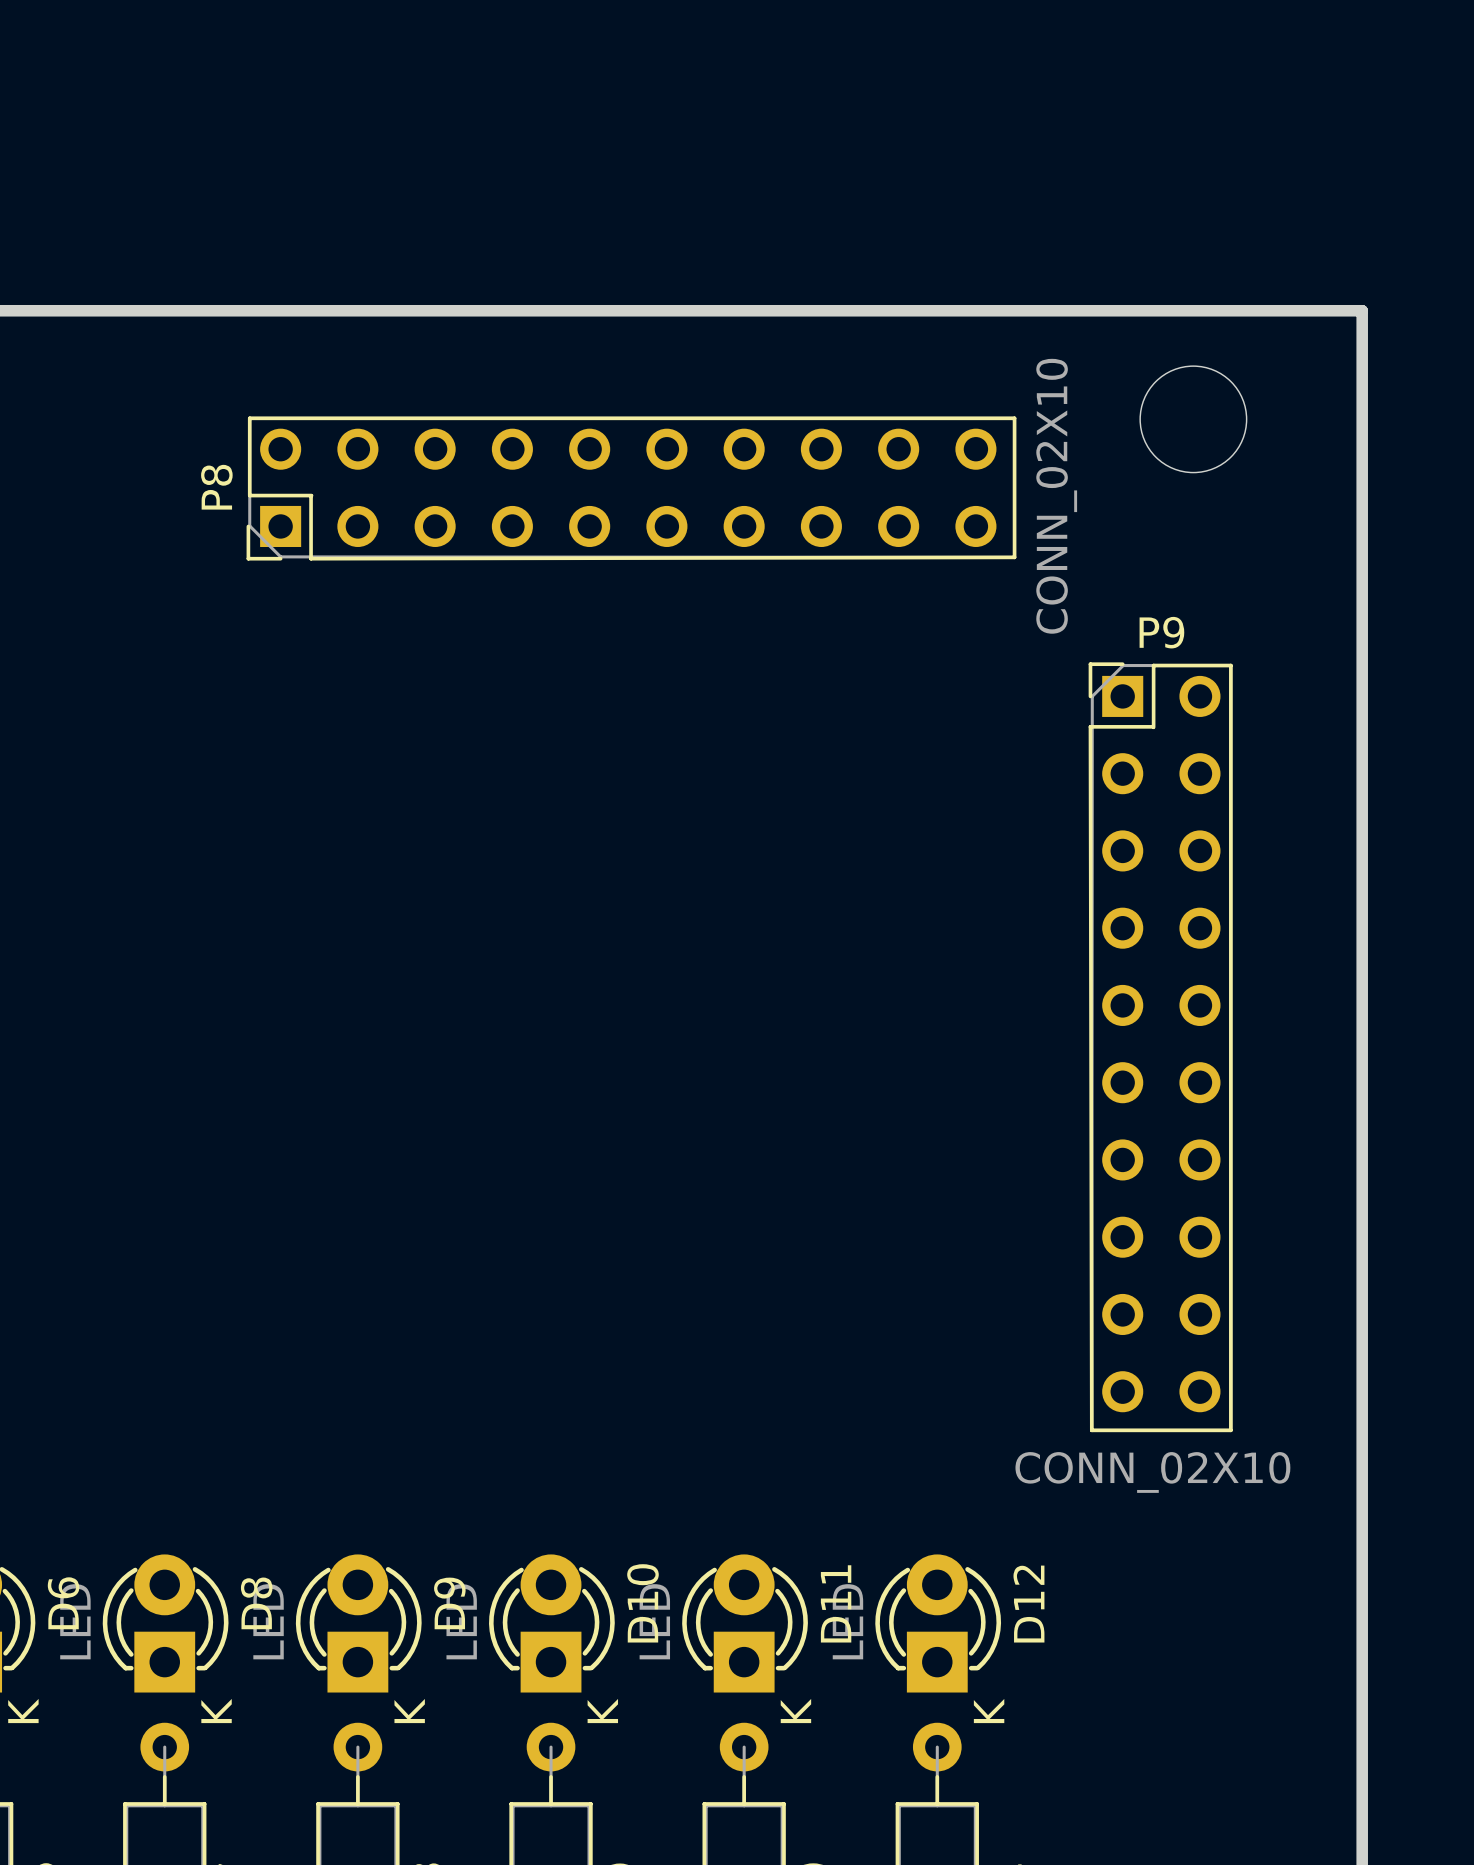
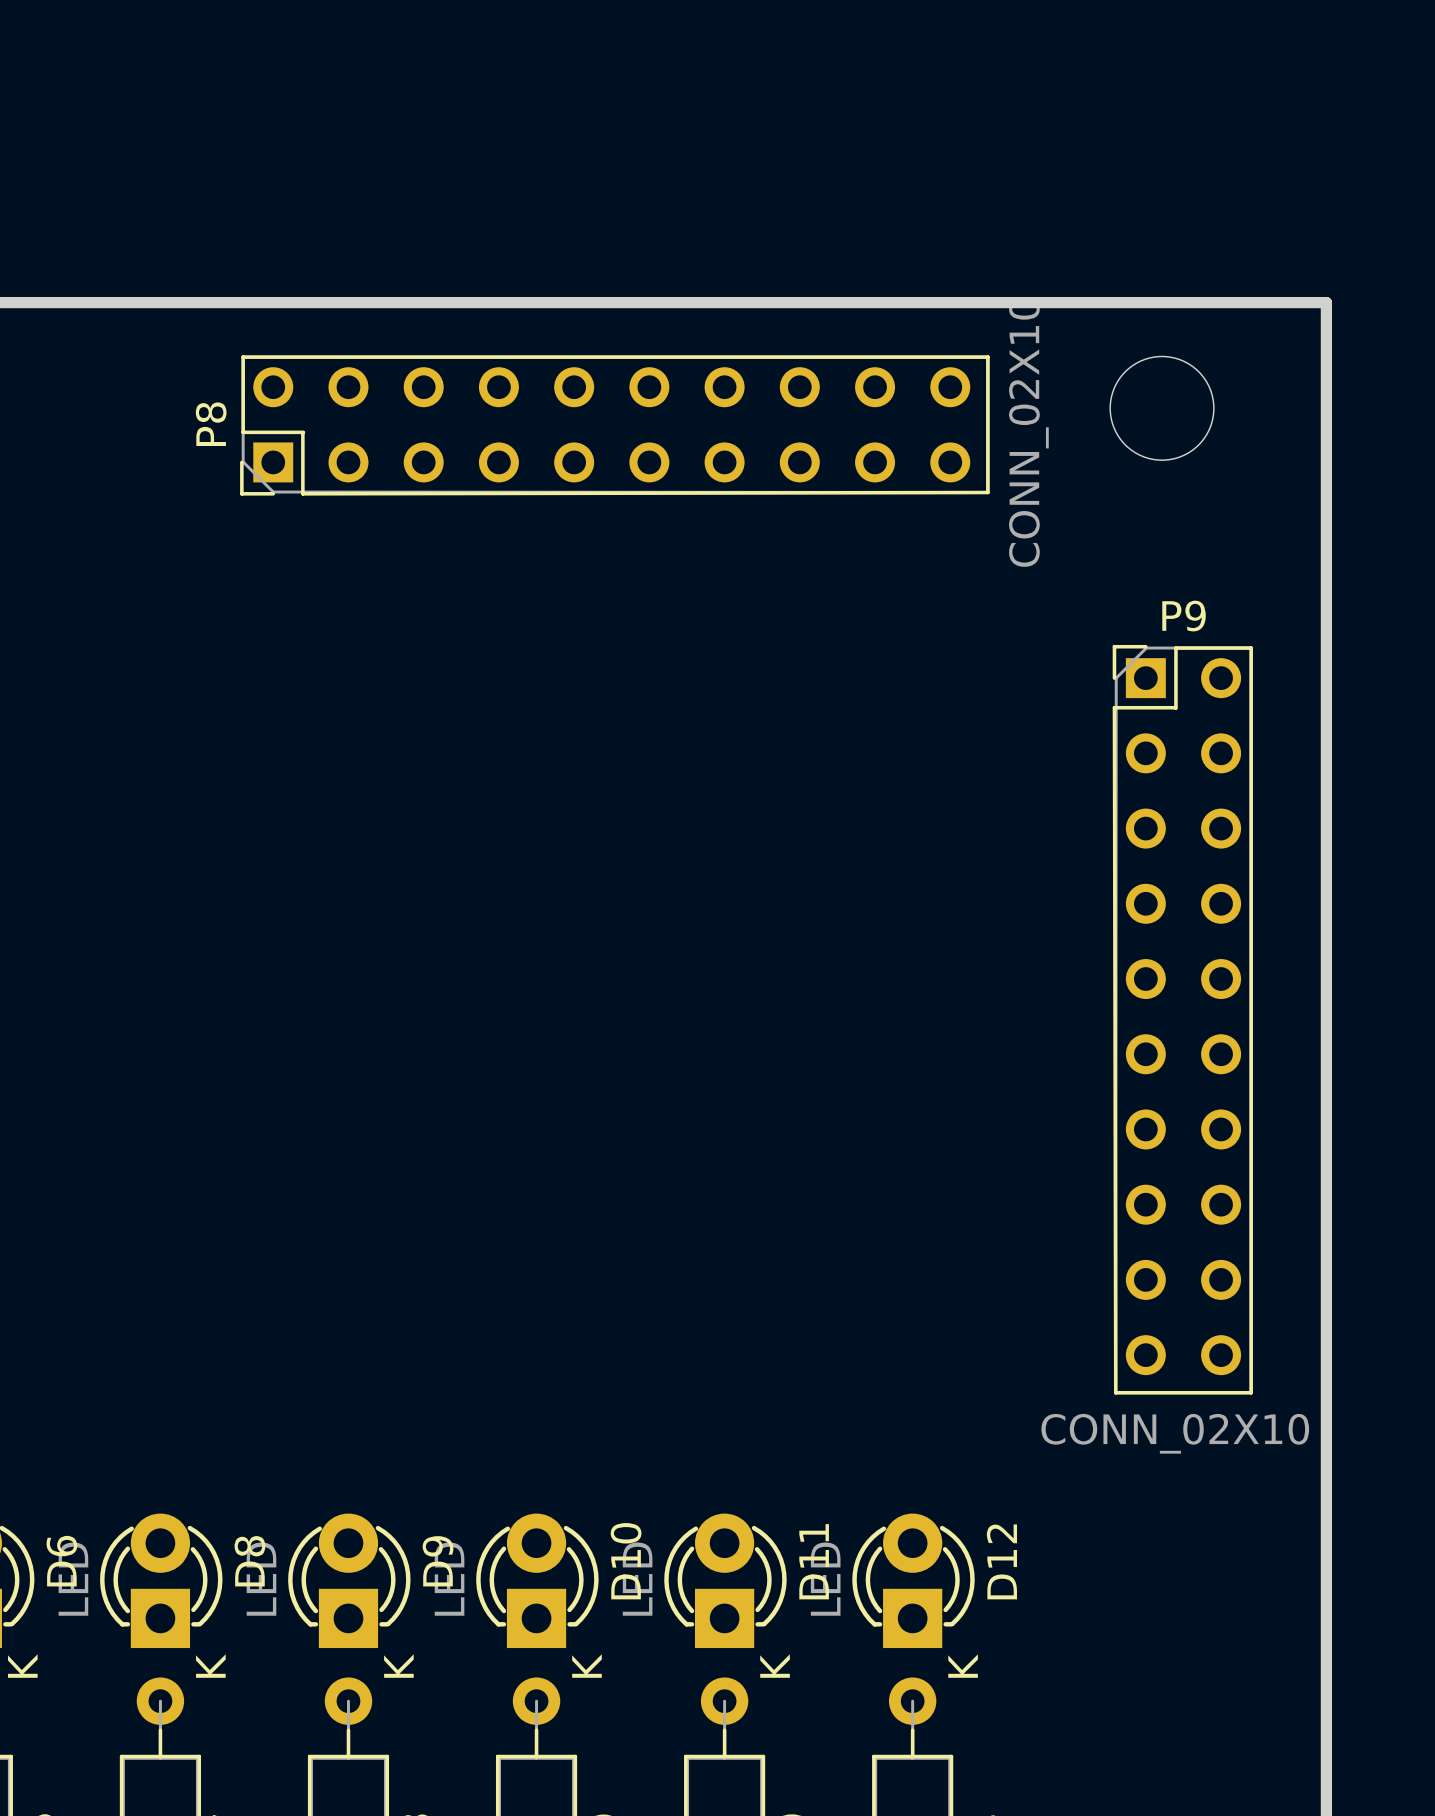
P8 position: (631, 488) -> (614, 425)
P9 position: (1160, 1047) -> (1182, 1019)

